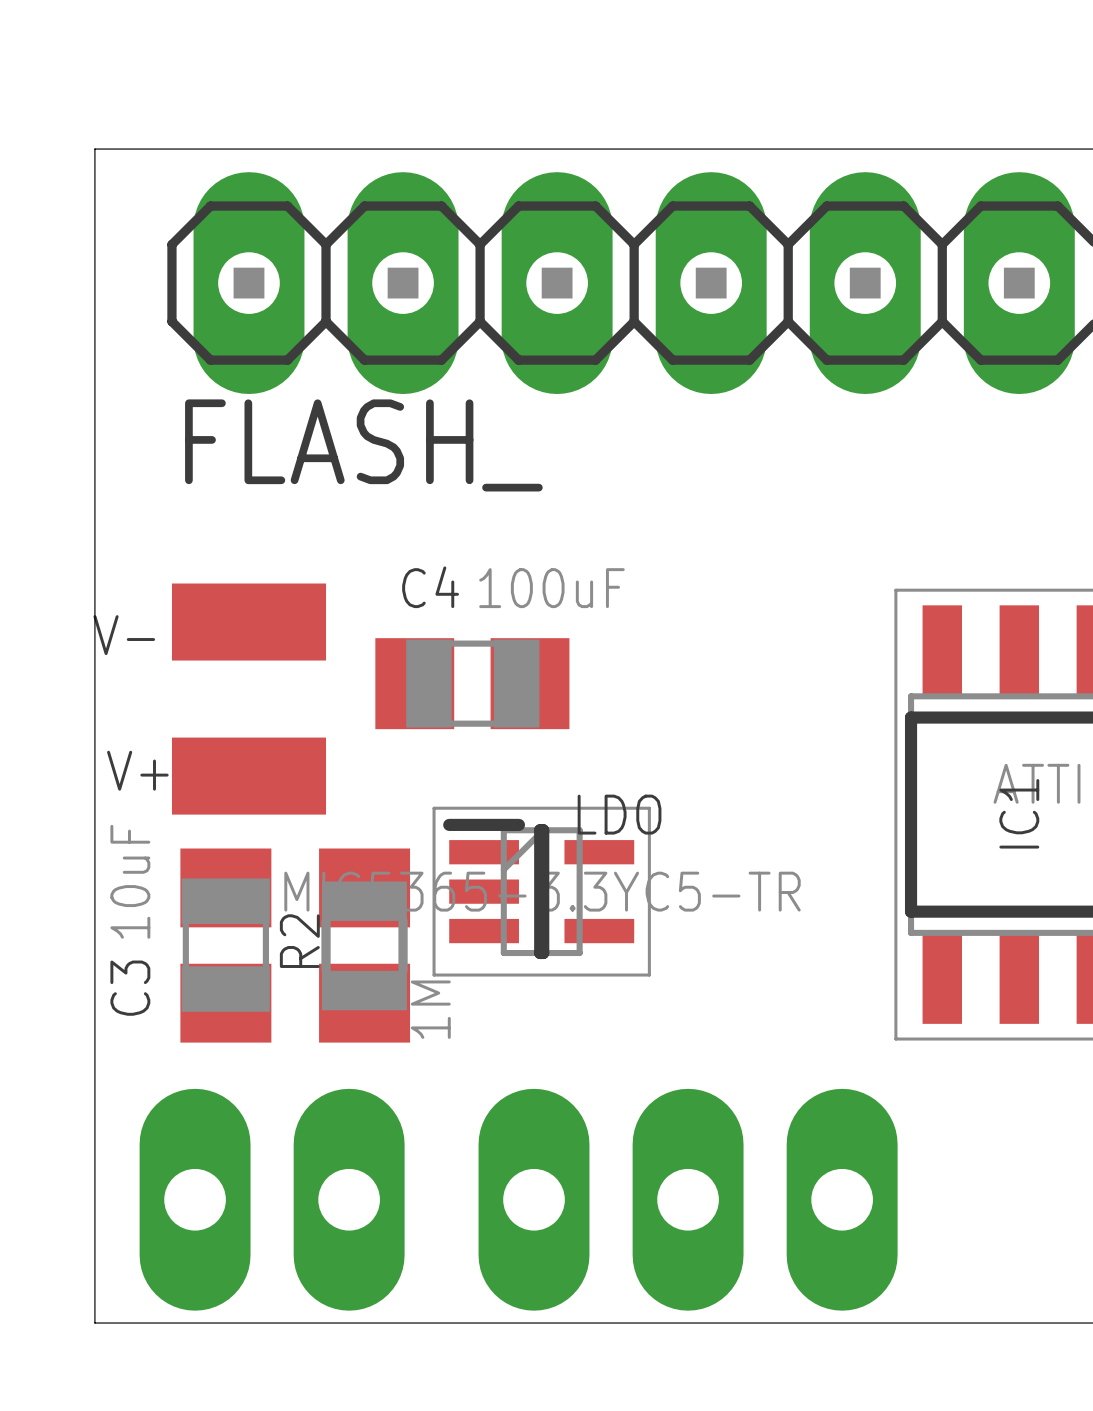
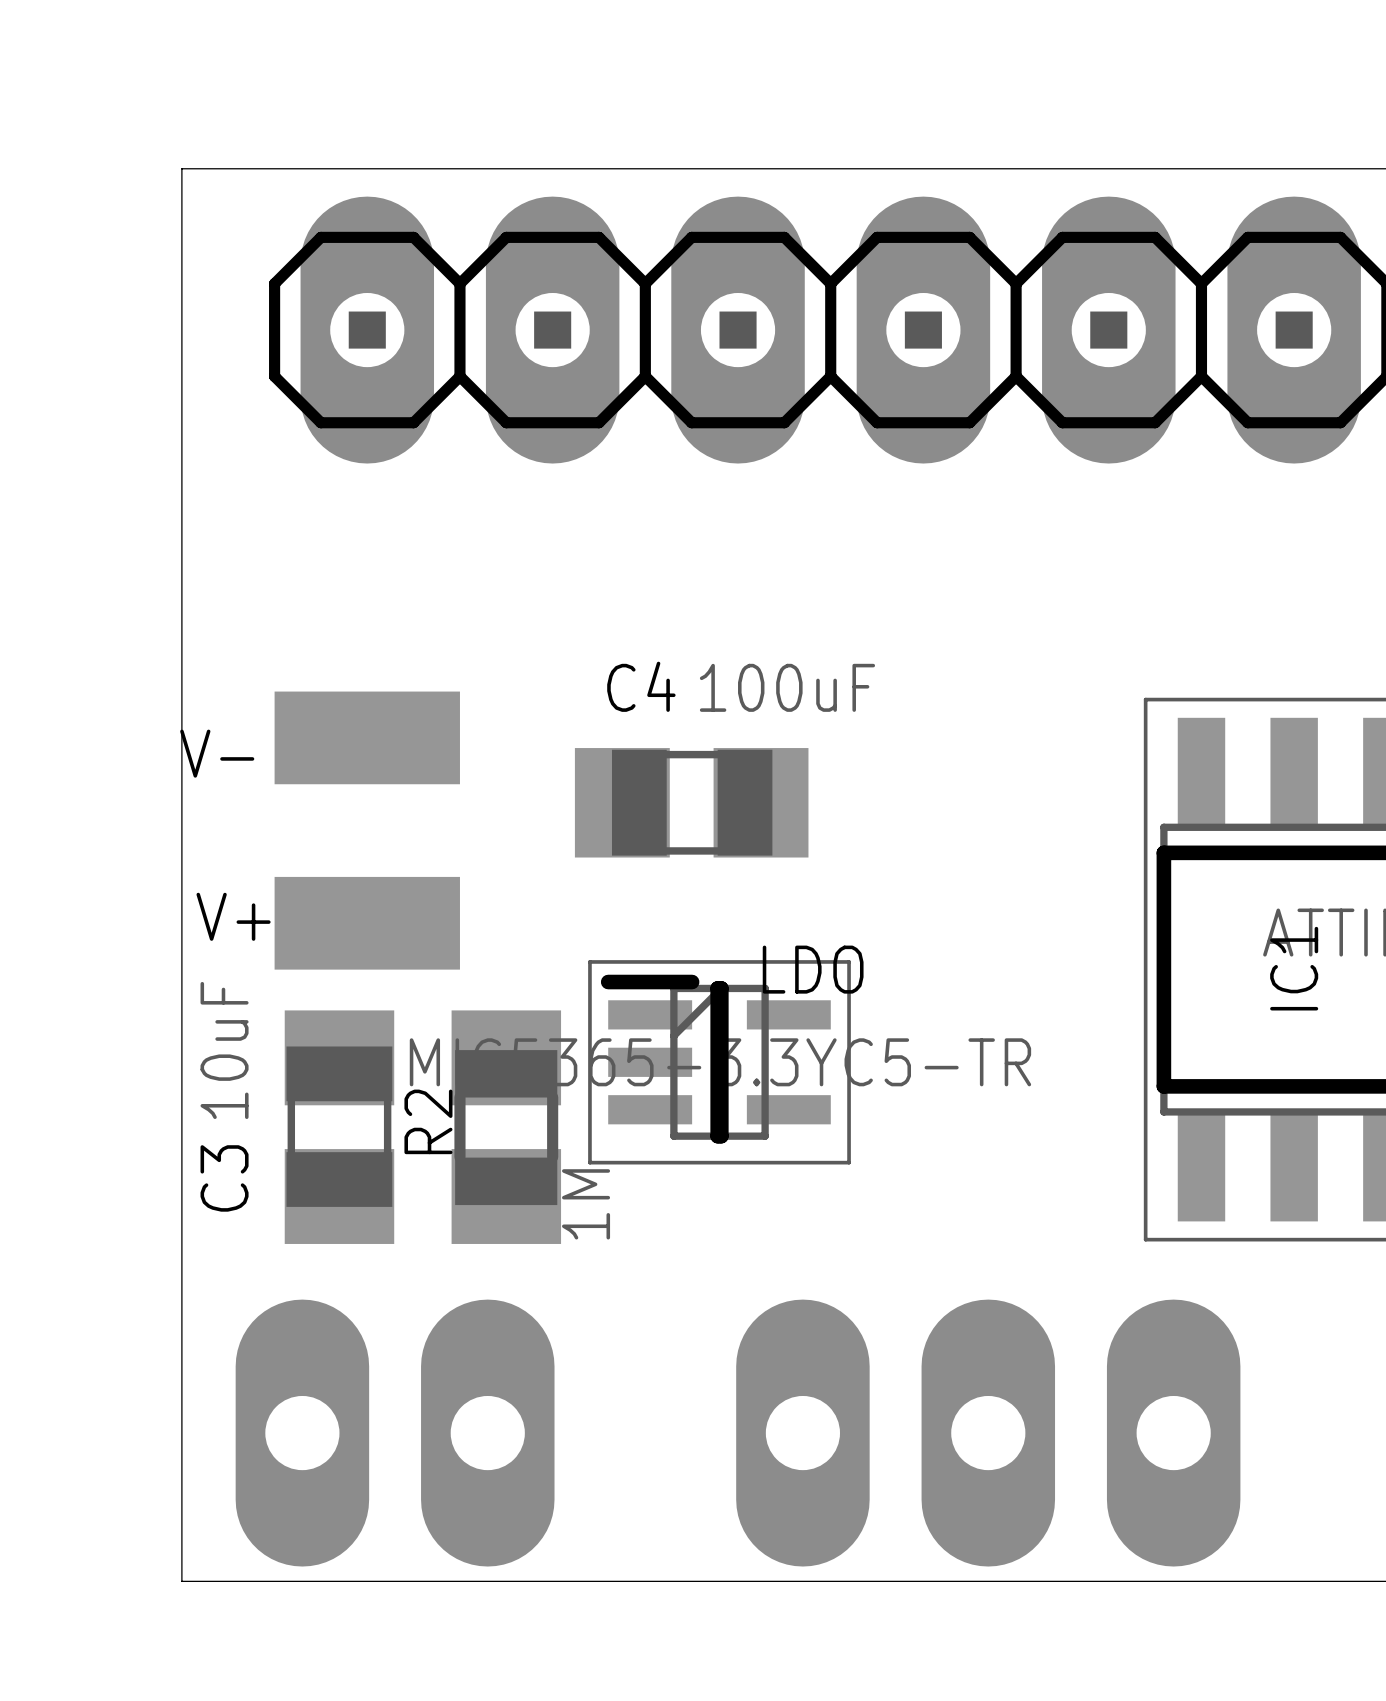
FLASH_ name: FLASH_ (363, 445) -> none
C4 position: (472, 683) -> (691, 802)
part position: (688, 1199) -> (988, 1433)

